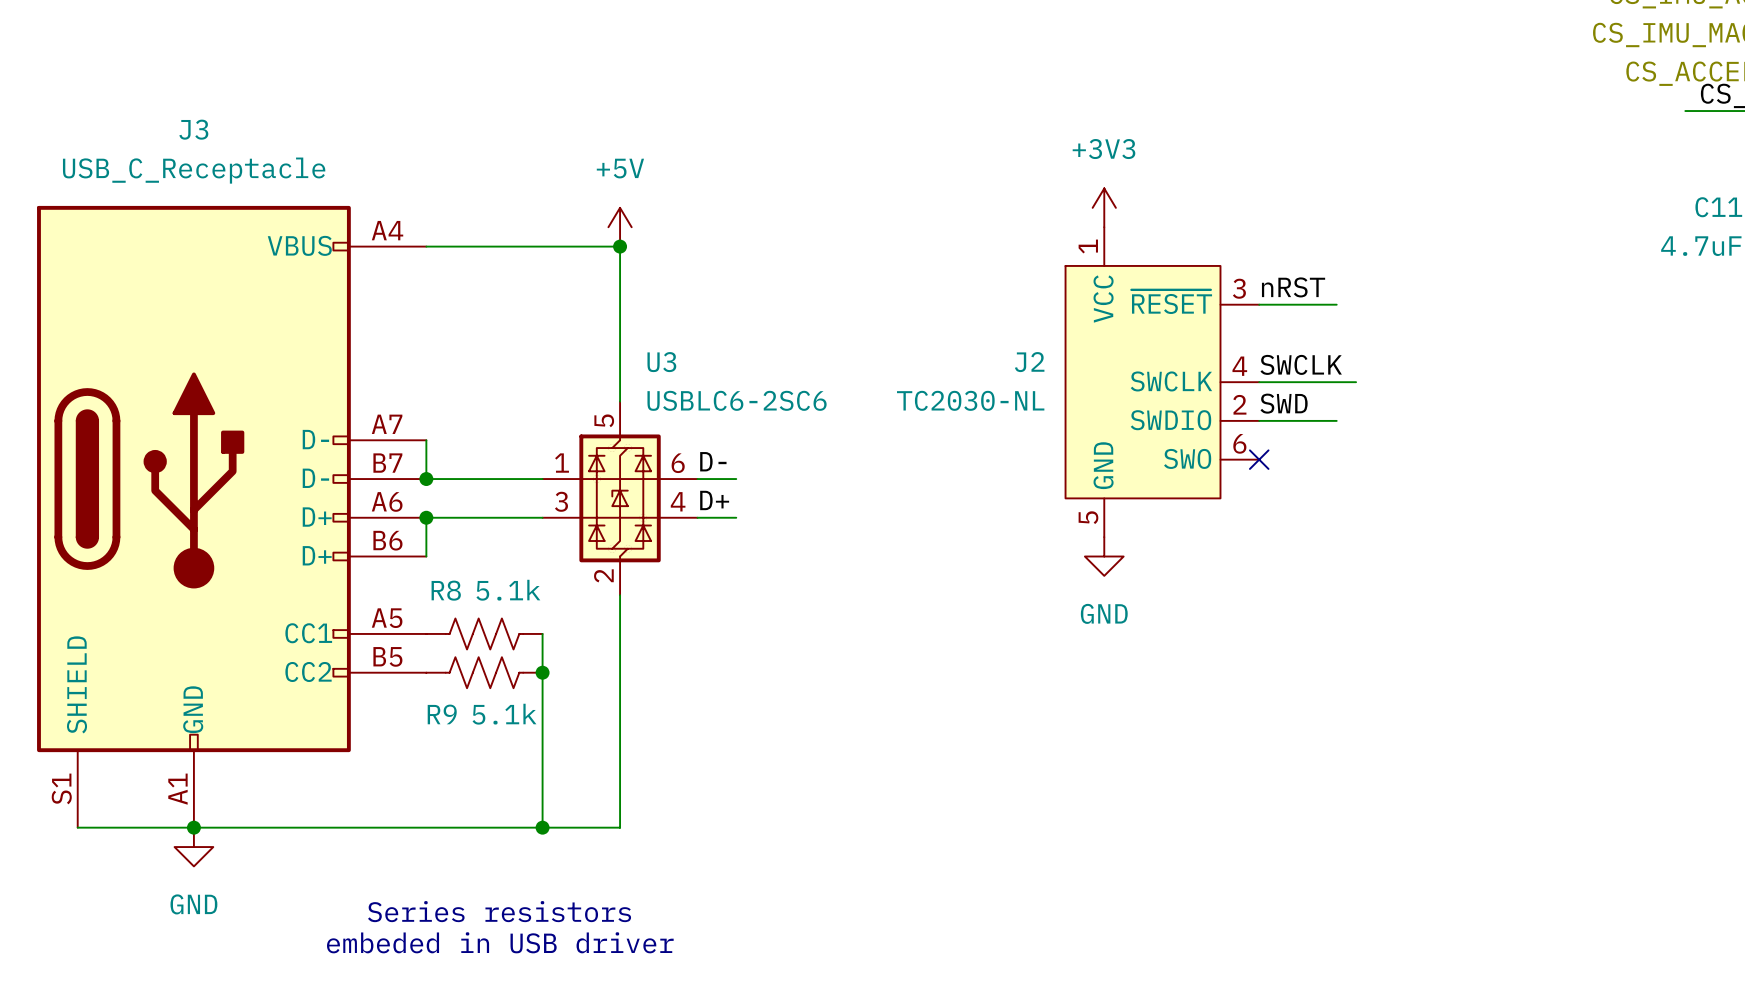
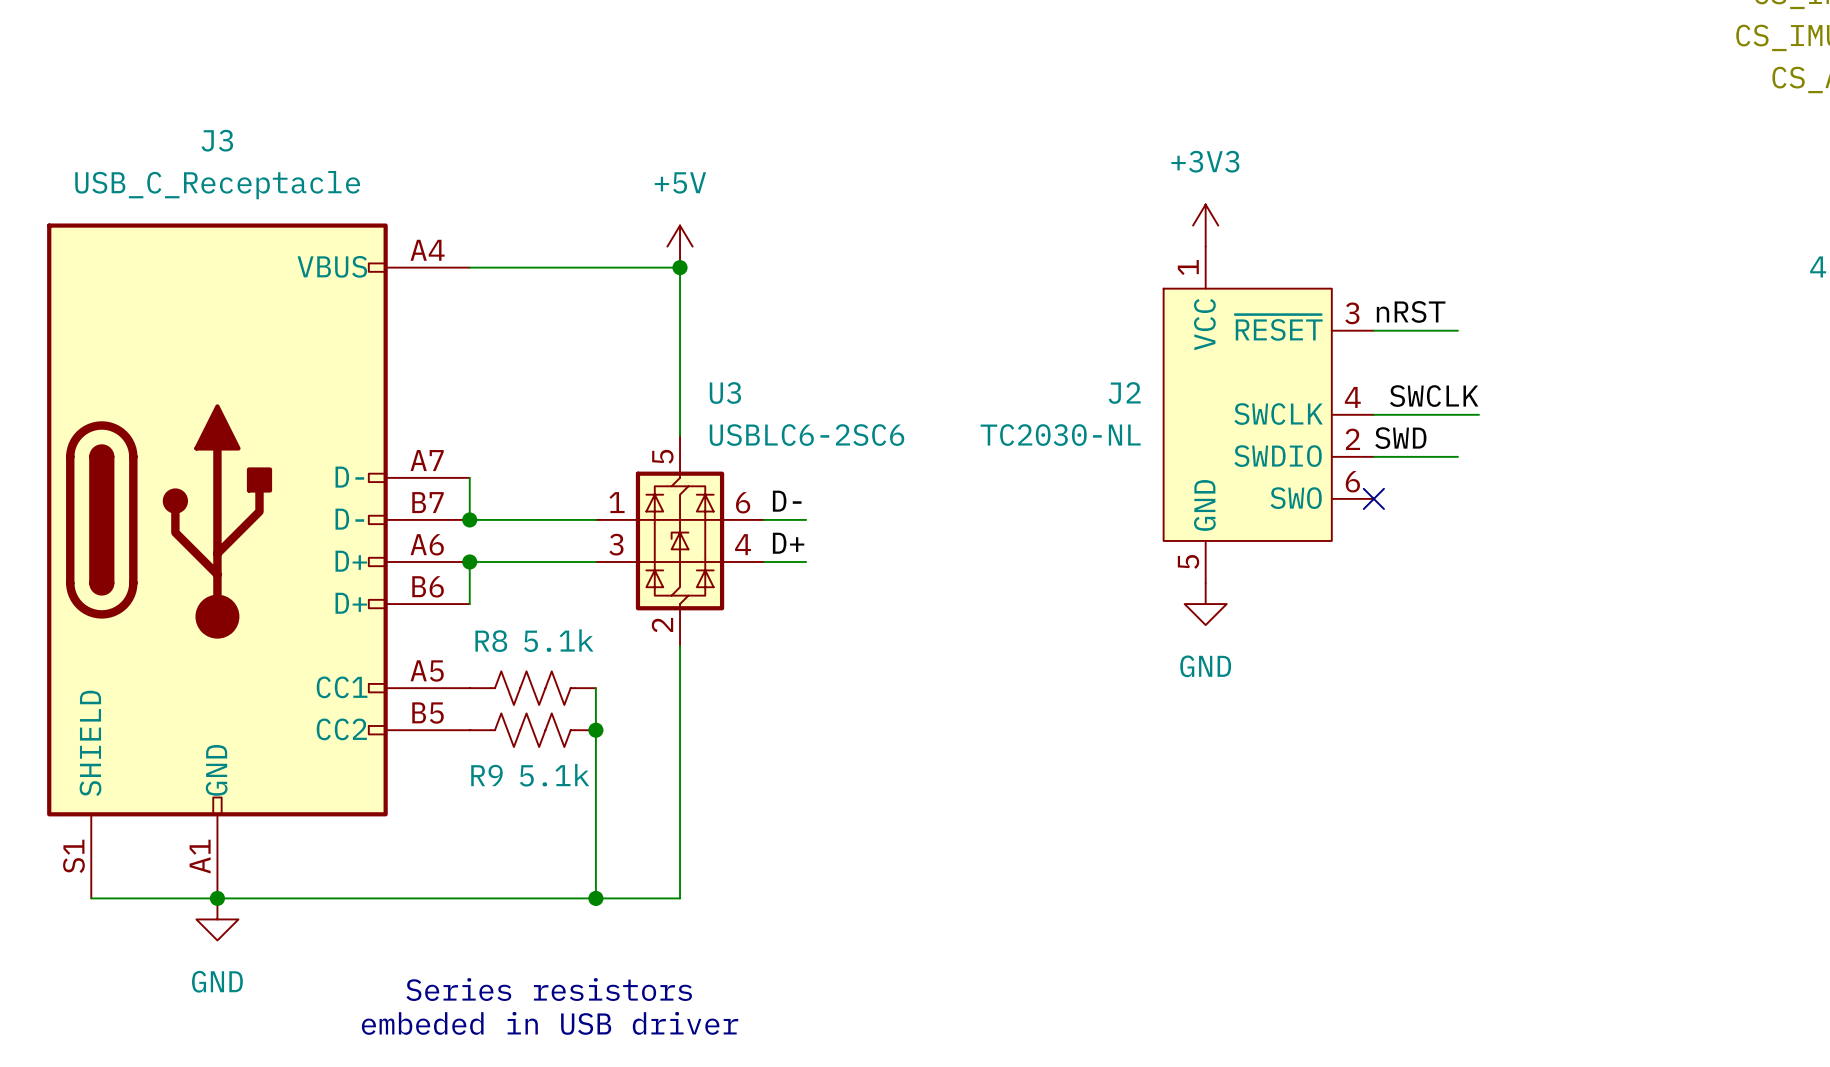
label position: SWCLK (1301, 364) -> SWCLK (1434, 396)
label position: D- (713, 461) -> D- (787, 501)
label position: D+ (714, 500) -> D+ (788, 543)

